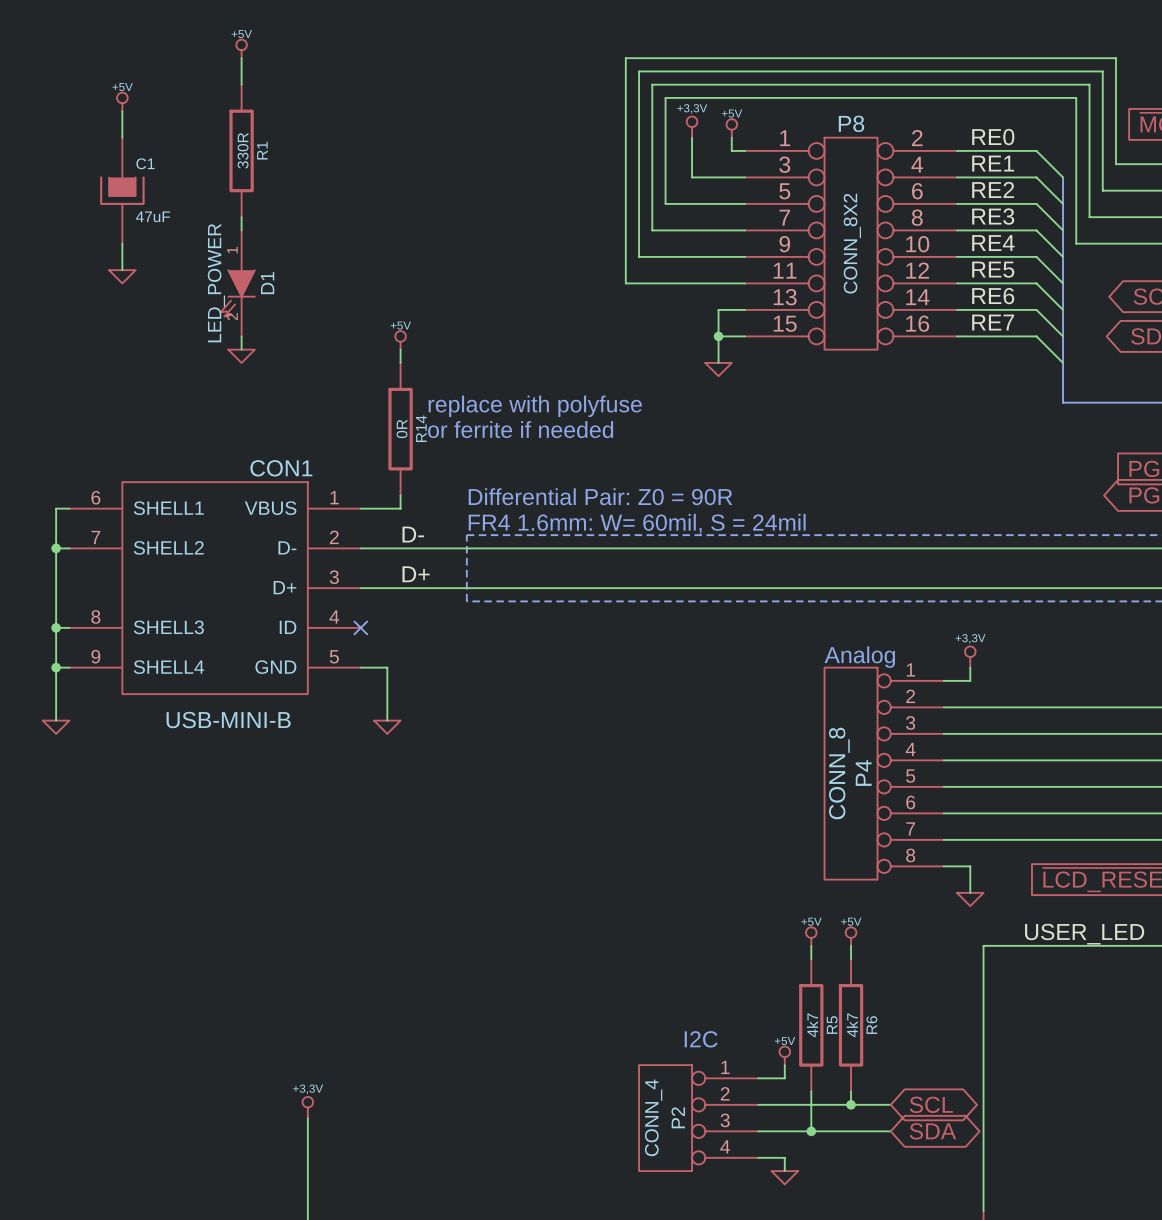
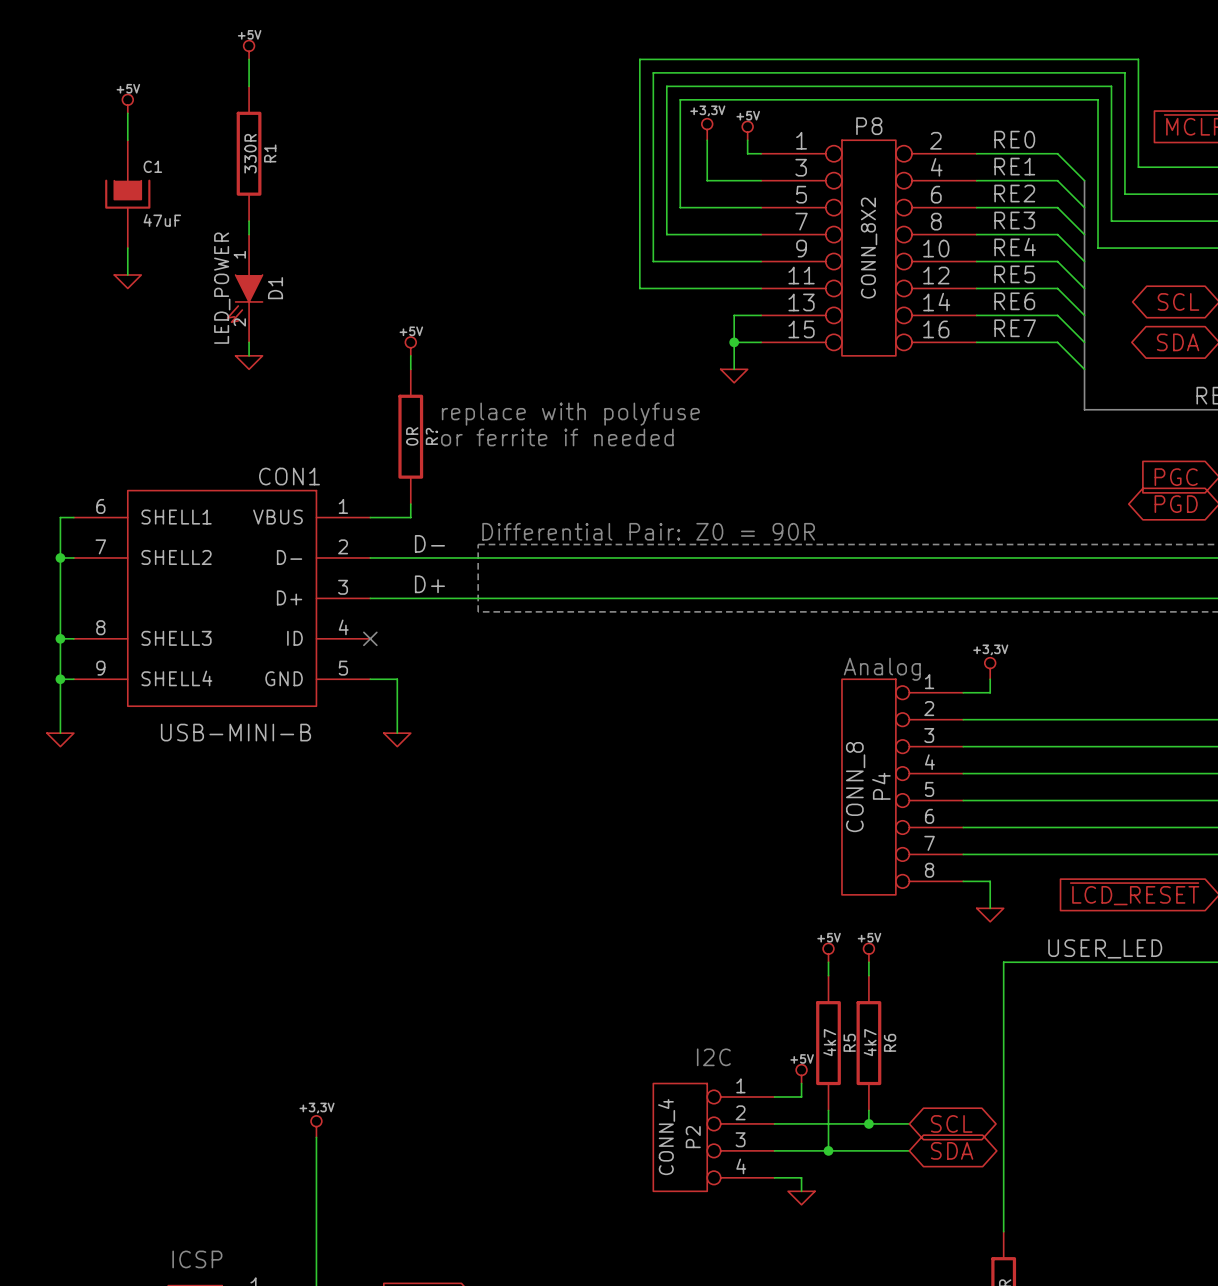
R14 name: R14 (421, 428) -> R? (431, 436)
text: Differential Pair: Z0 = 90R (600, 496) -> none
text: FR4 1.6mm: W= 60mil, S = 24mil (637, 523) -> Differential Pair: Z0 = 90R (648, 531)

